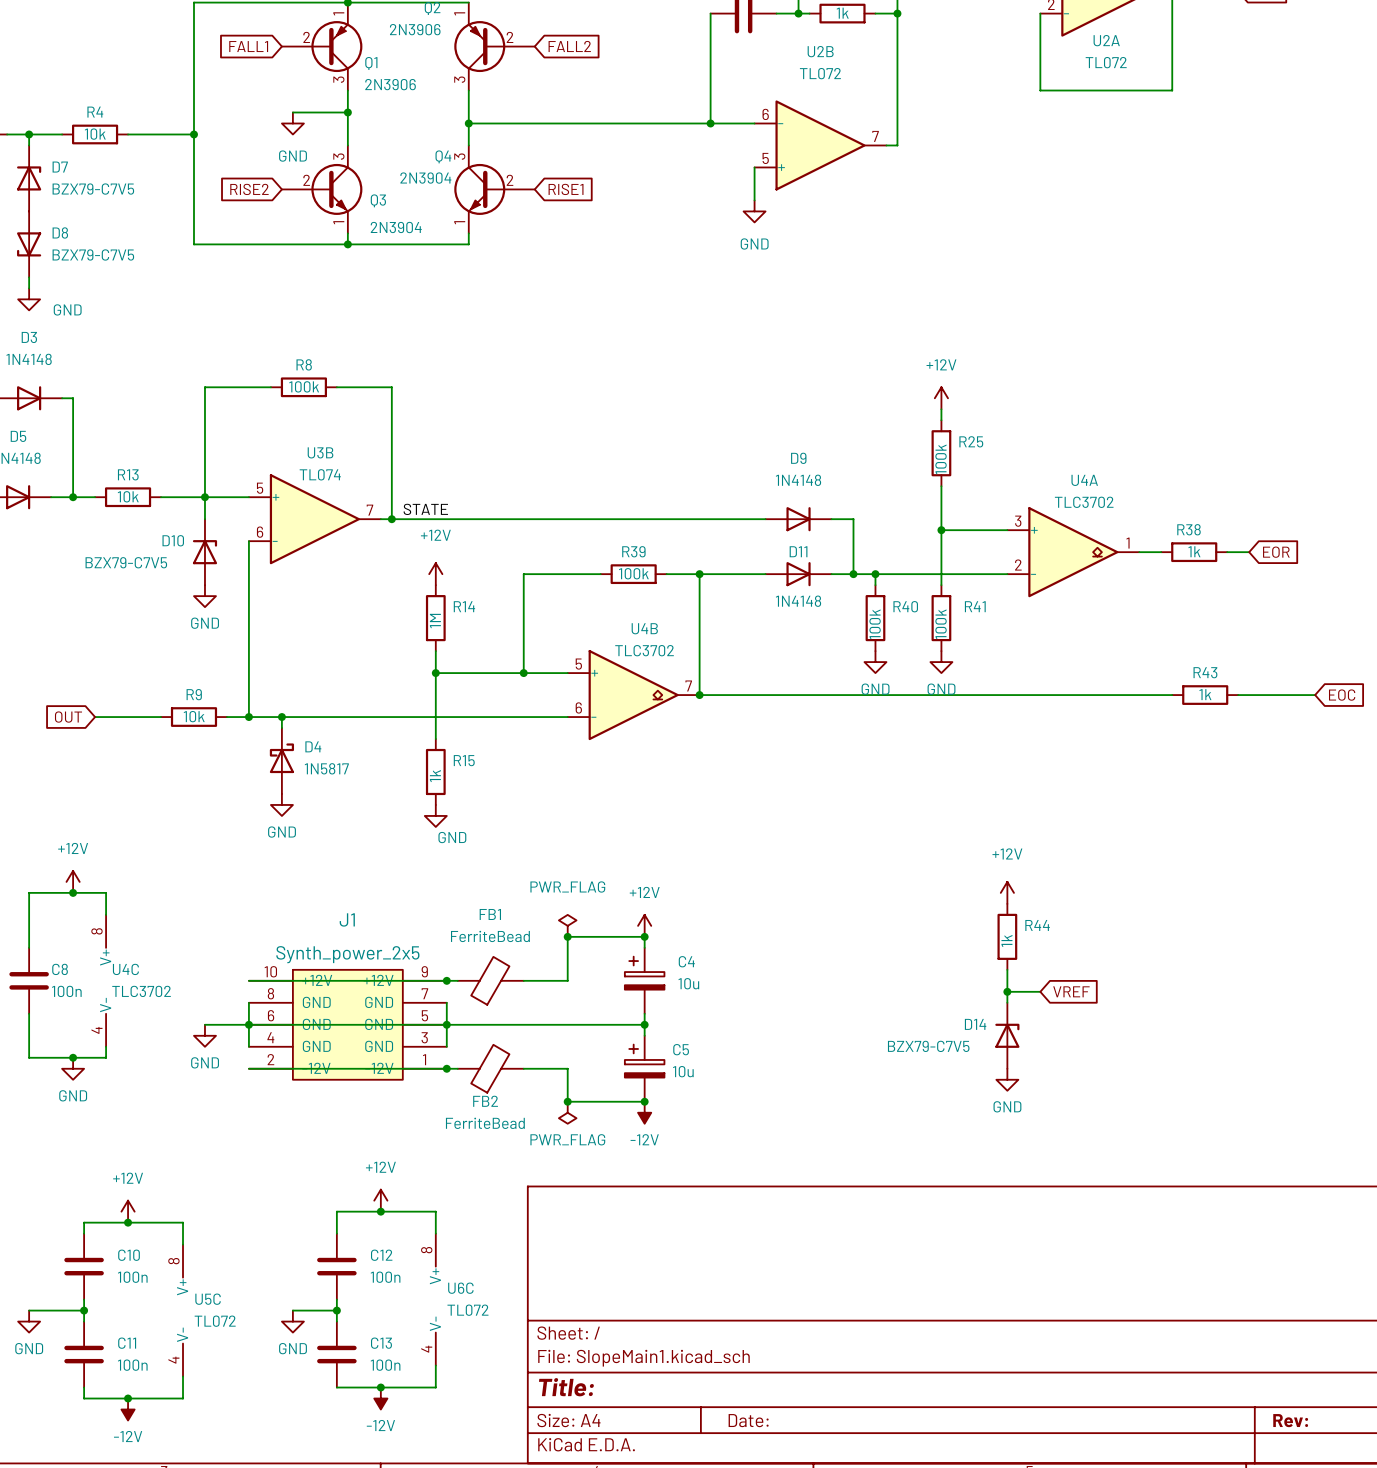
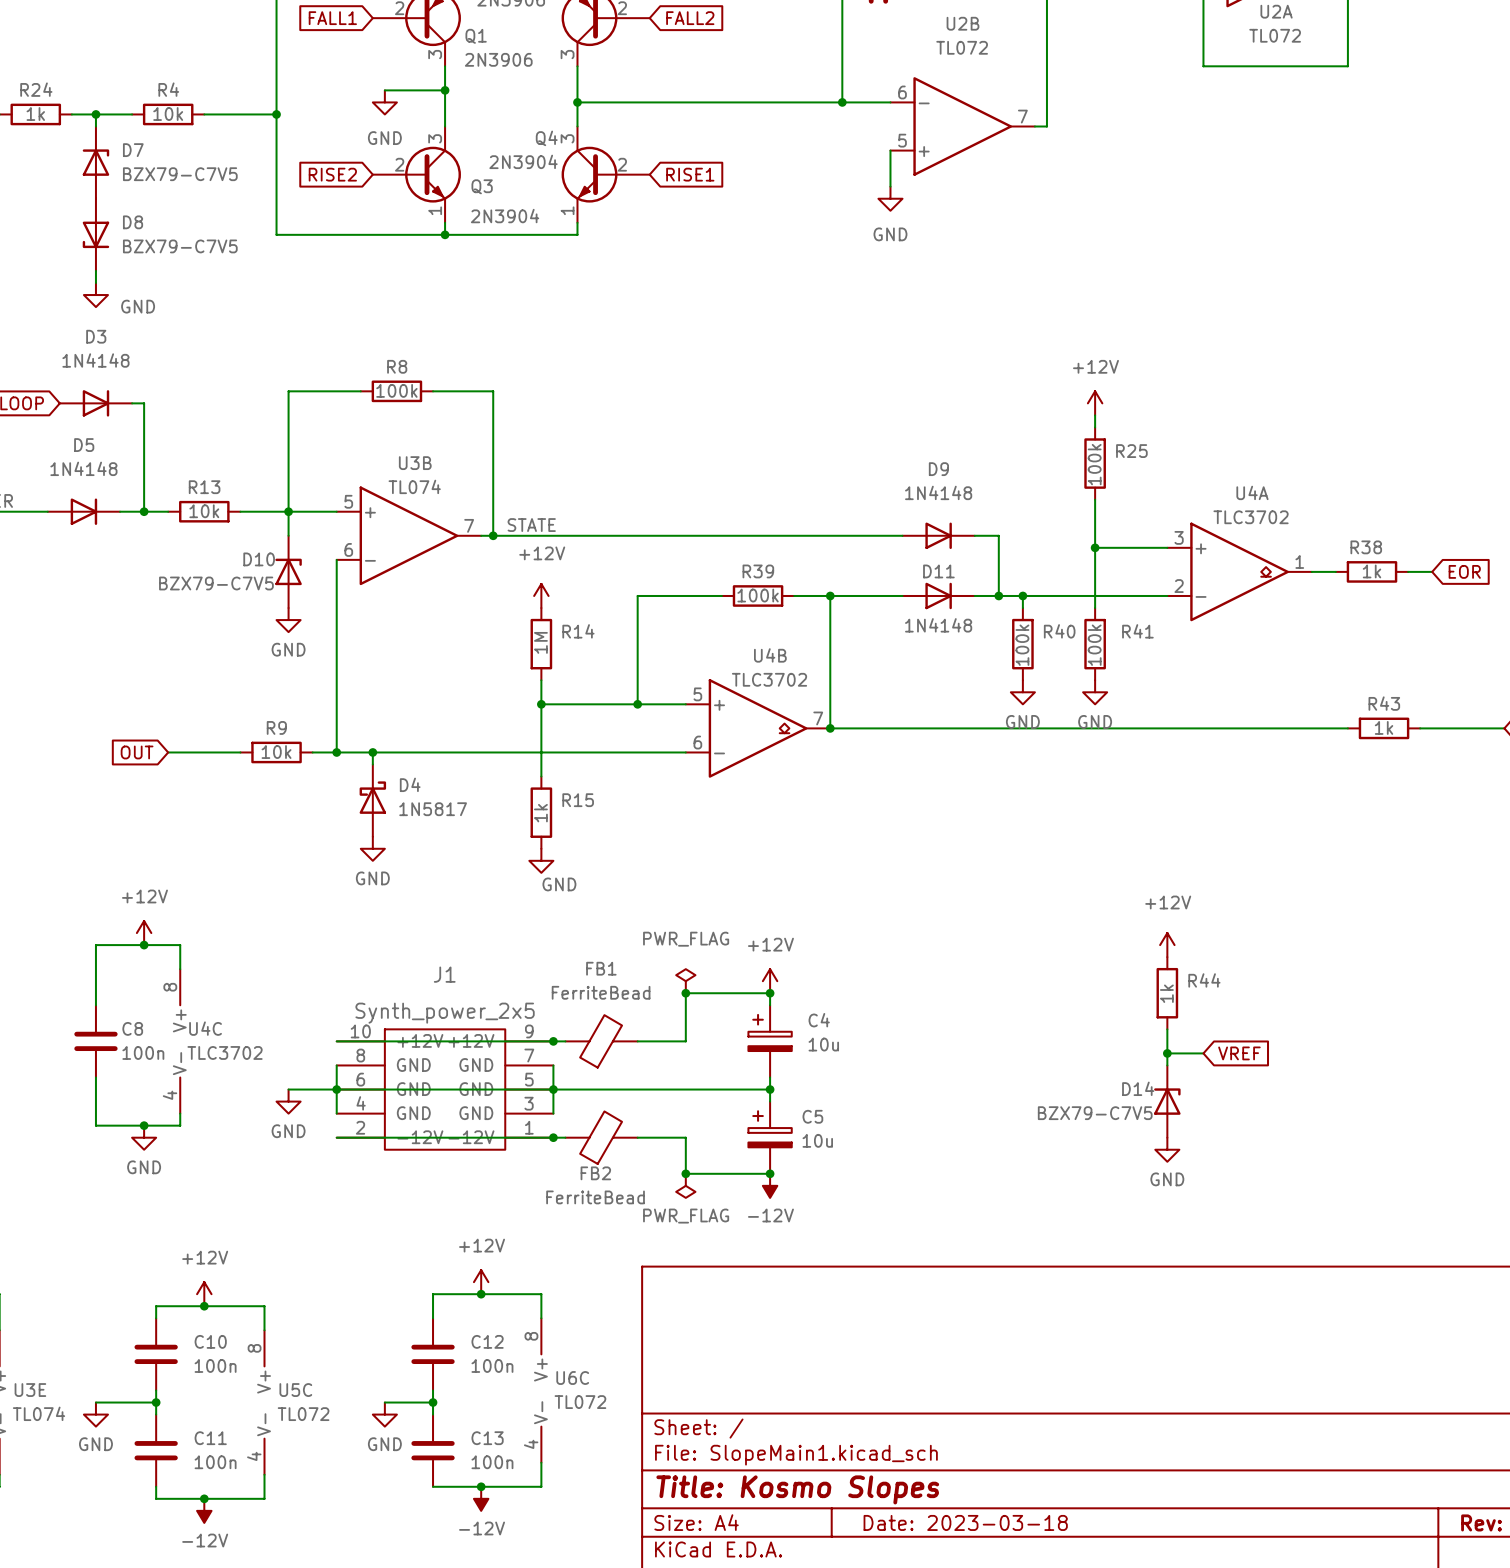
title block: Title: (566, 1387) -> Title: Kosmo Slopes (797, 1489)
title block: Date: (748, 1420) -> Date: 2023-03-18 (965, 1522)

